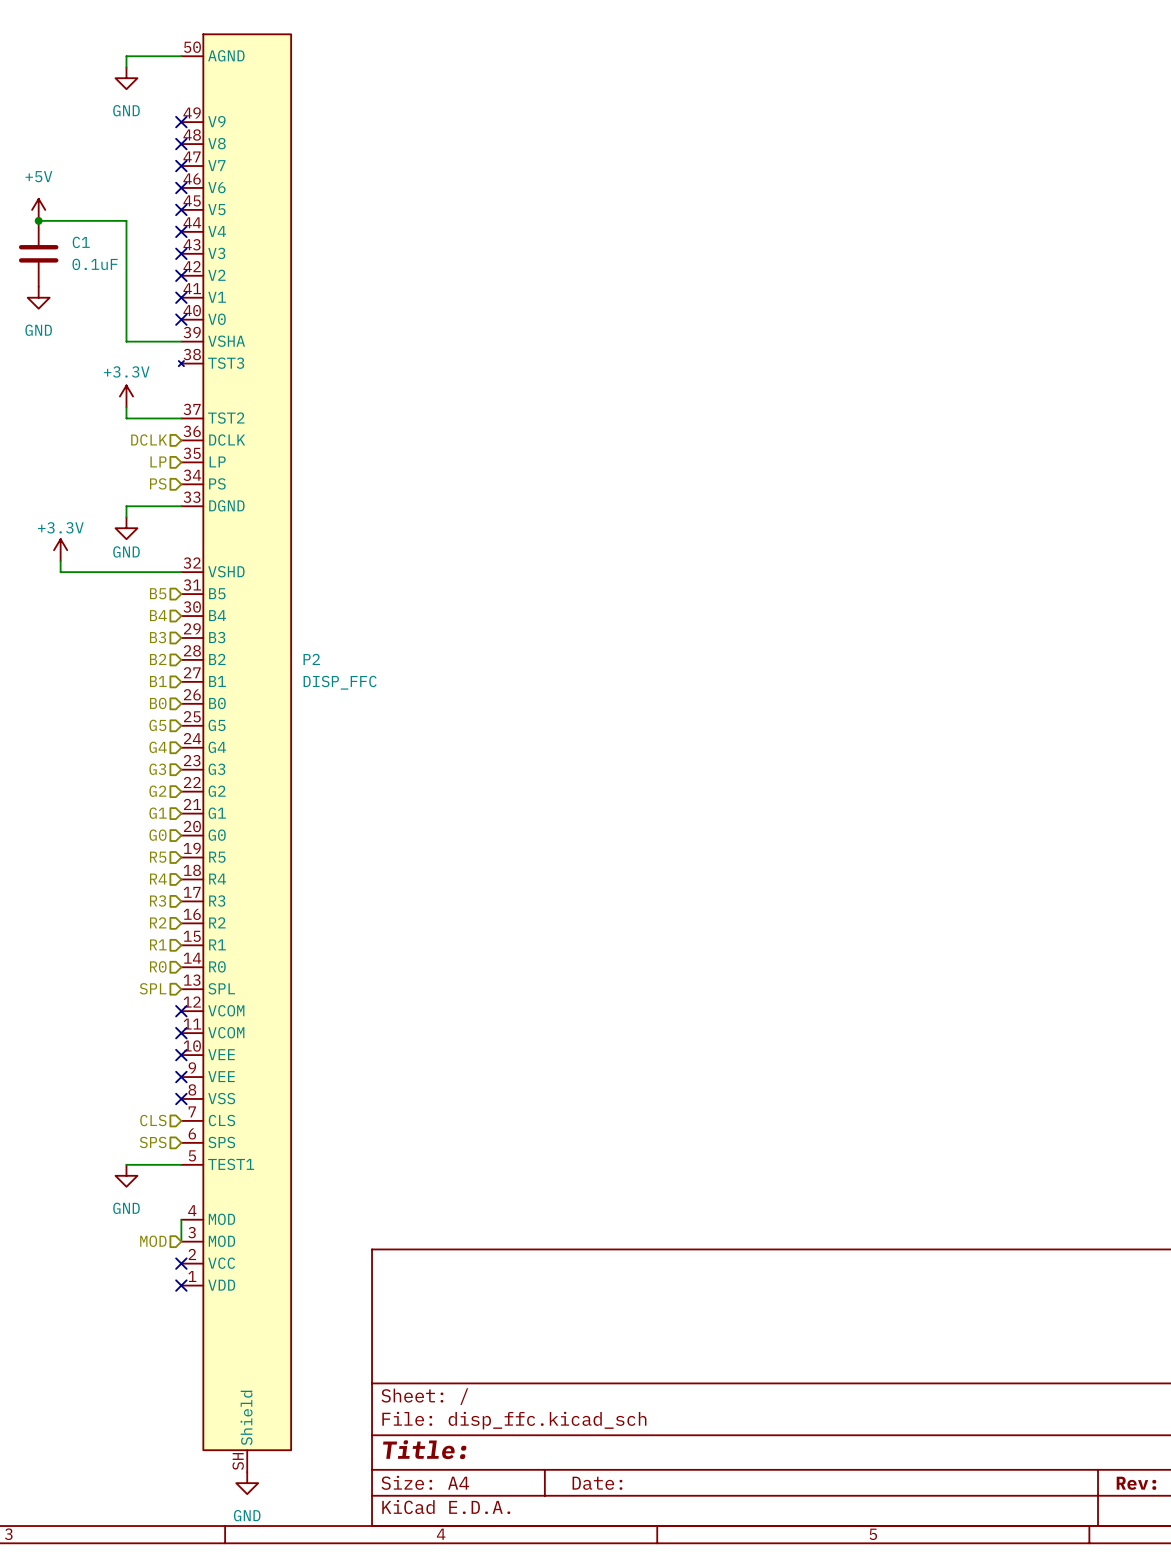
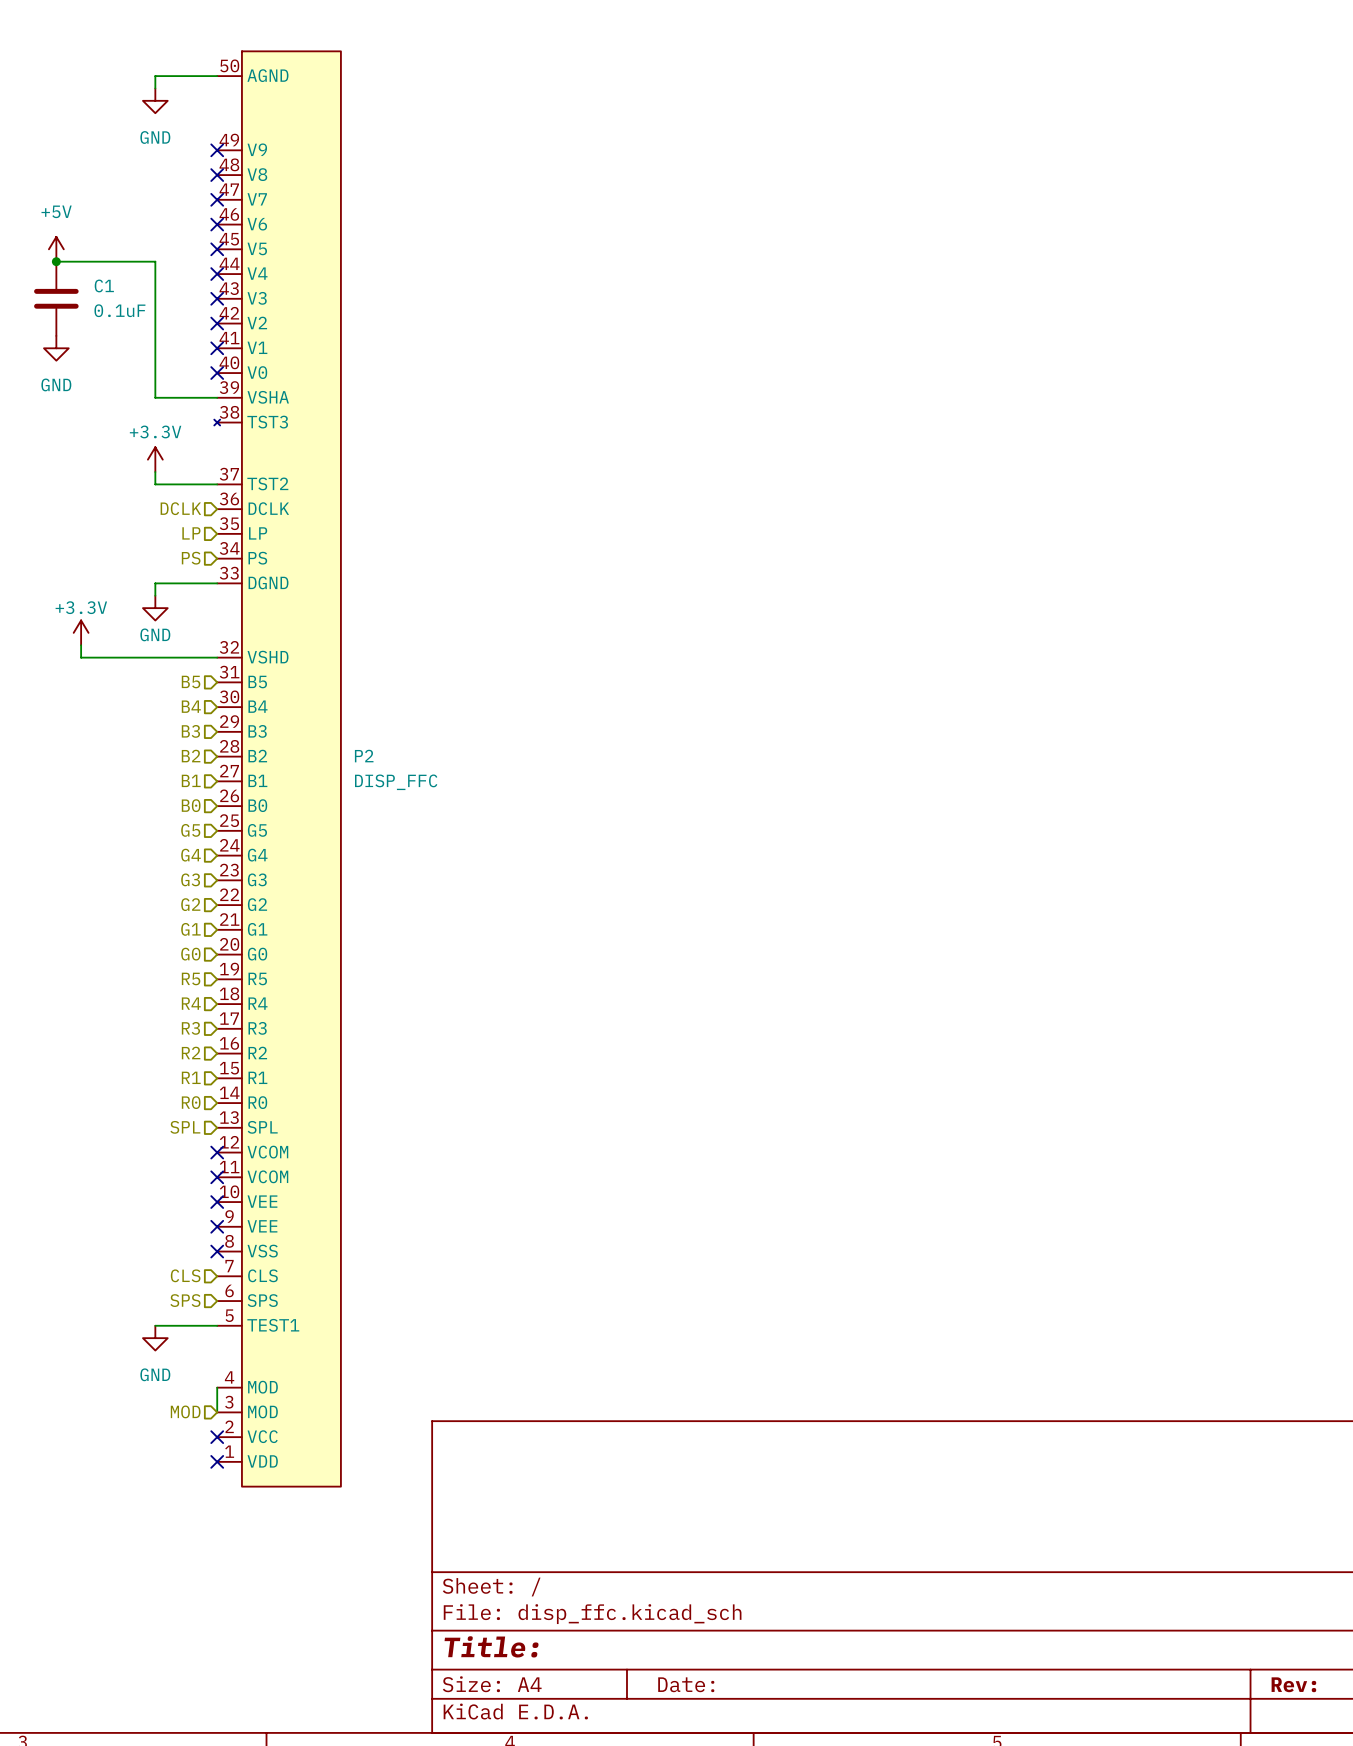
P2 symbol: [178, 34, 292, 1473] -> [214, 51, 341, 1487]
power symbol: GND (247, 1483) -> none

